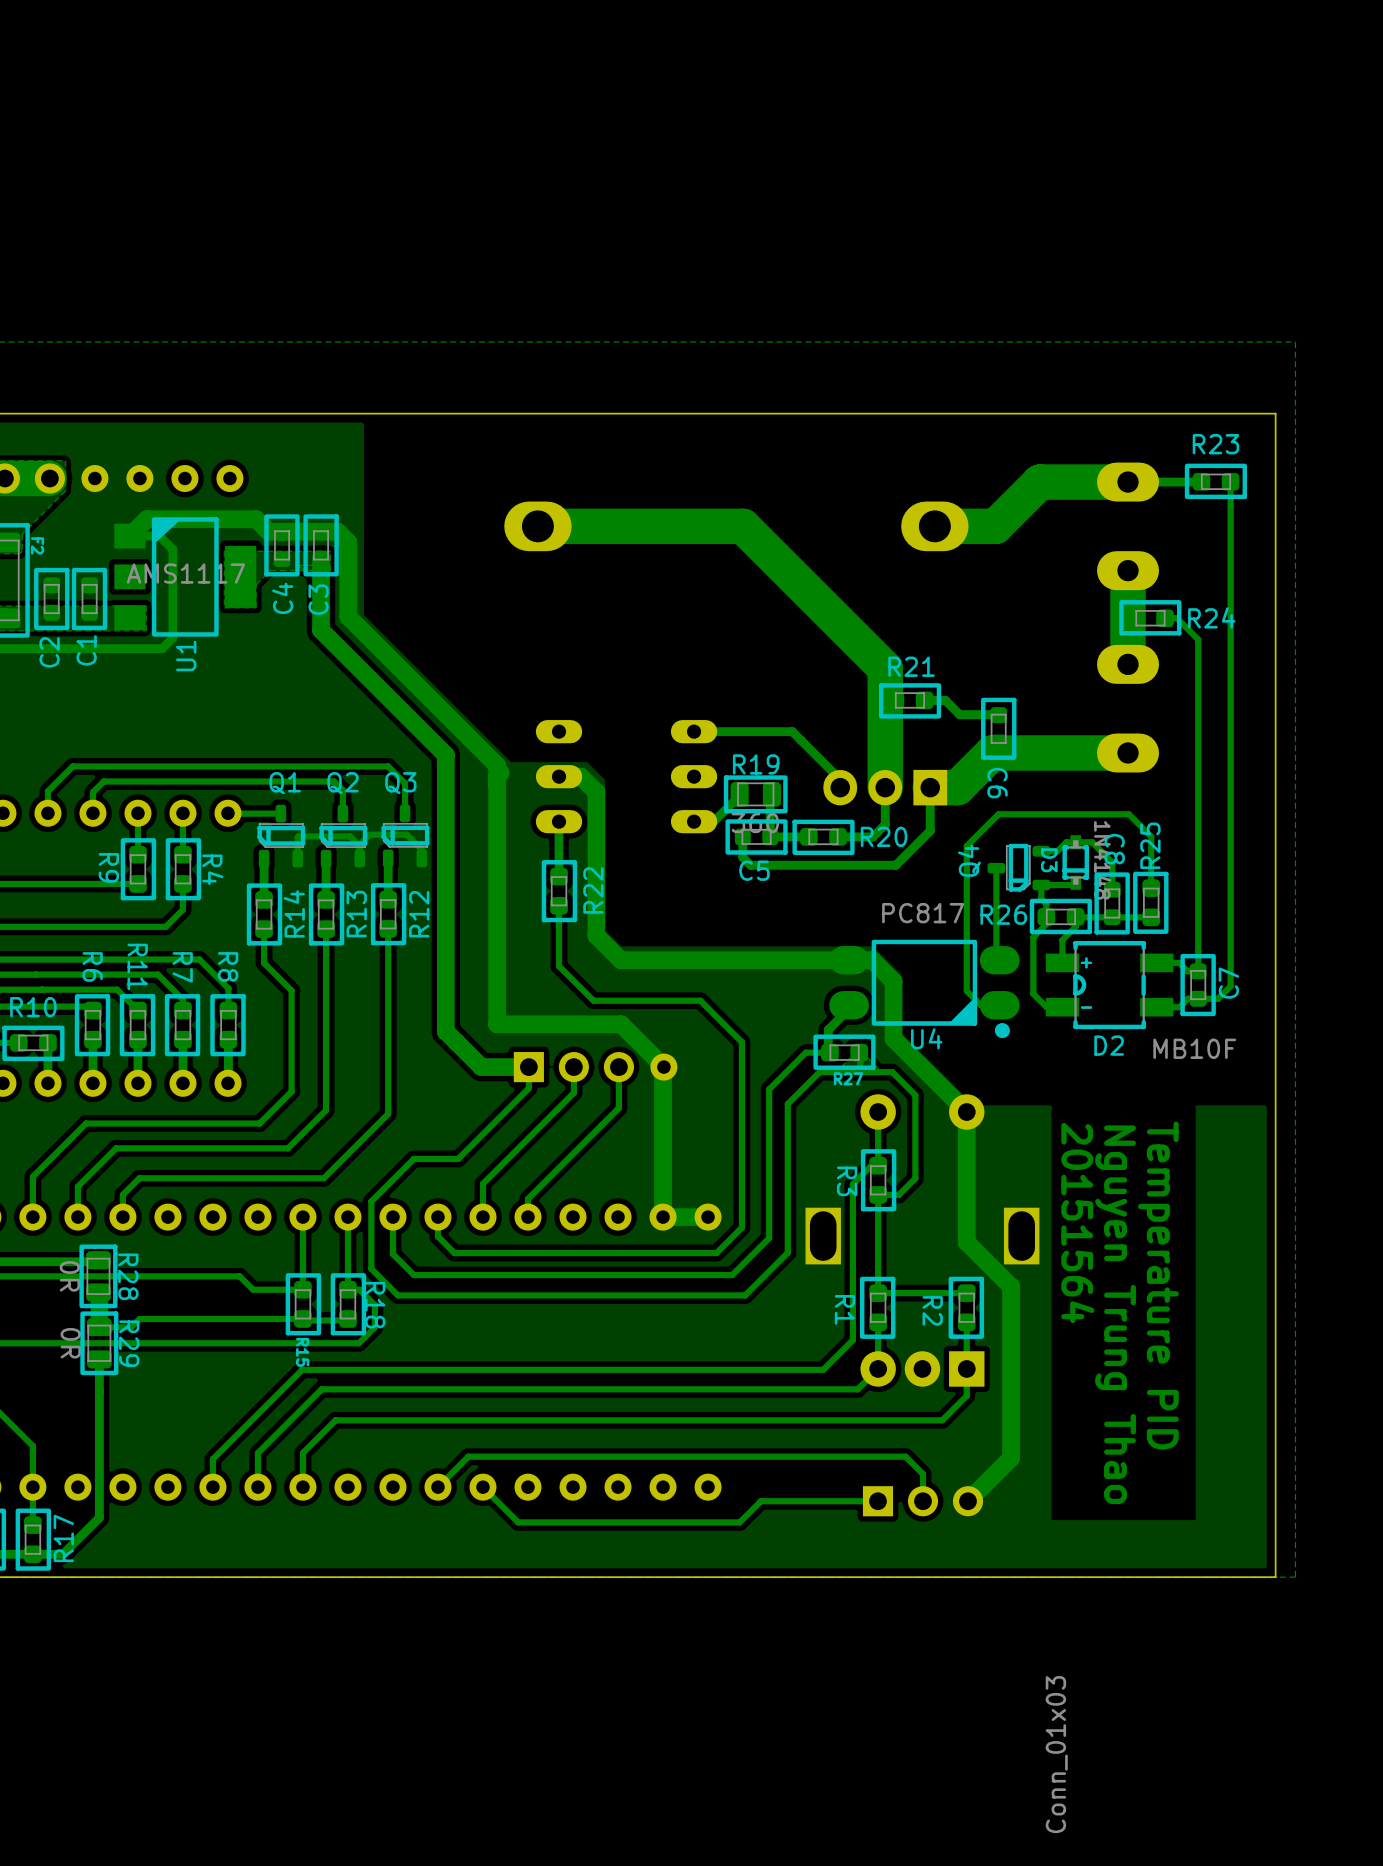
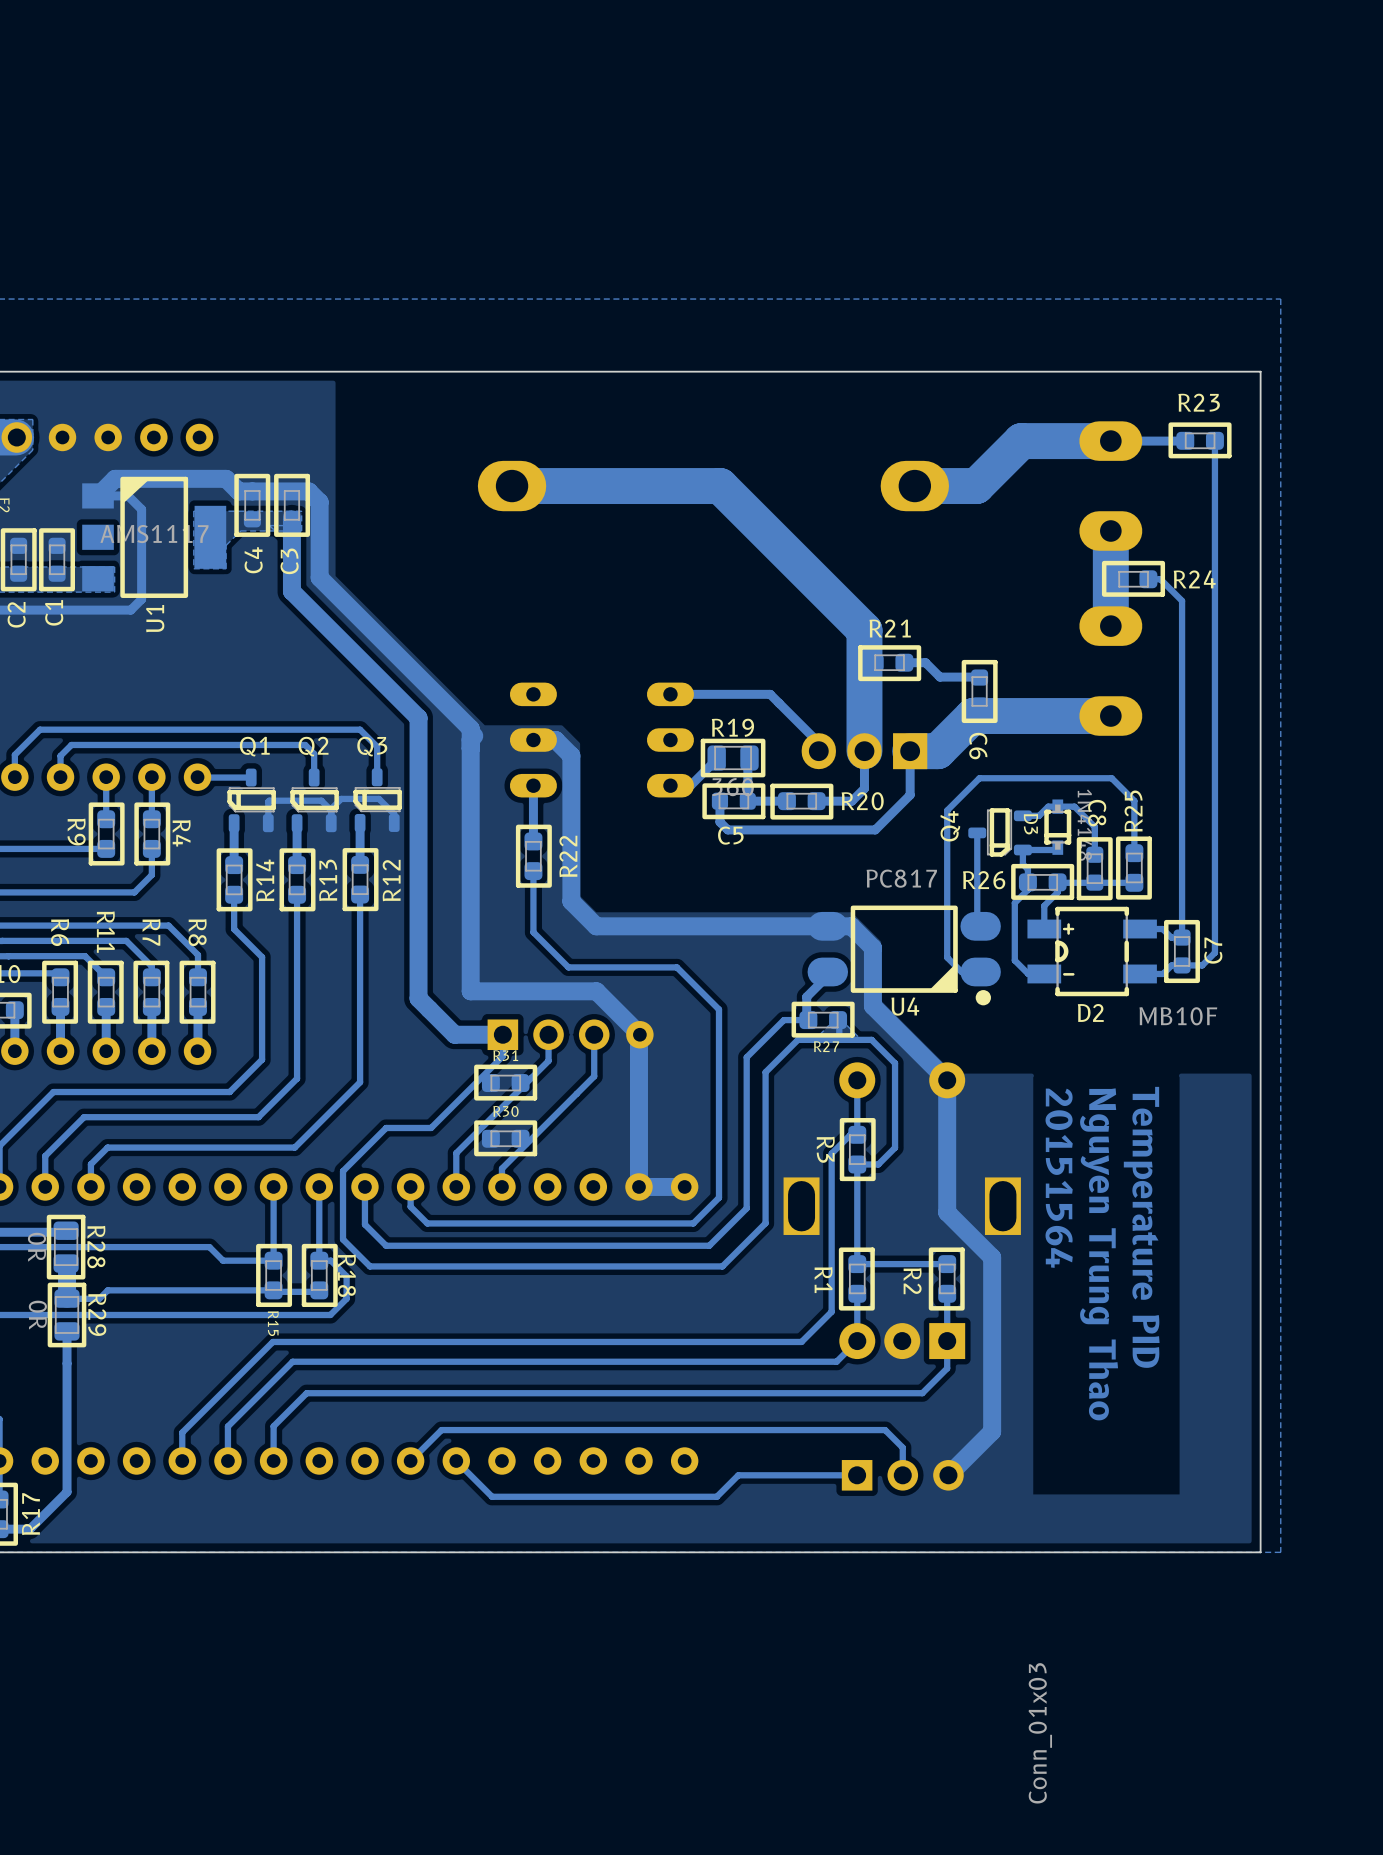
R31: none -> (505, 1082)
R30: none -> (505, 1138)

